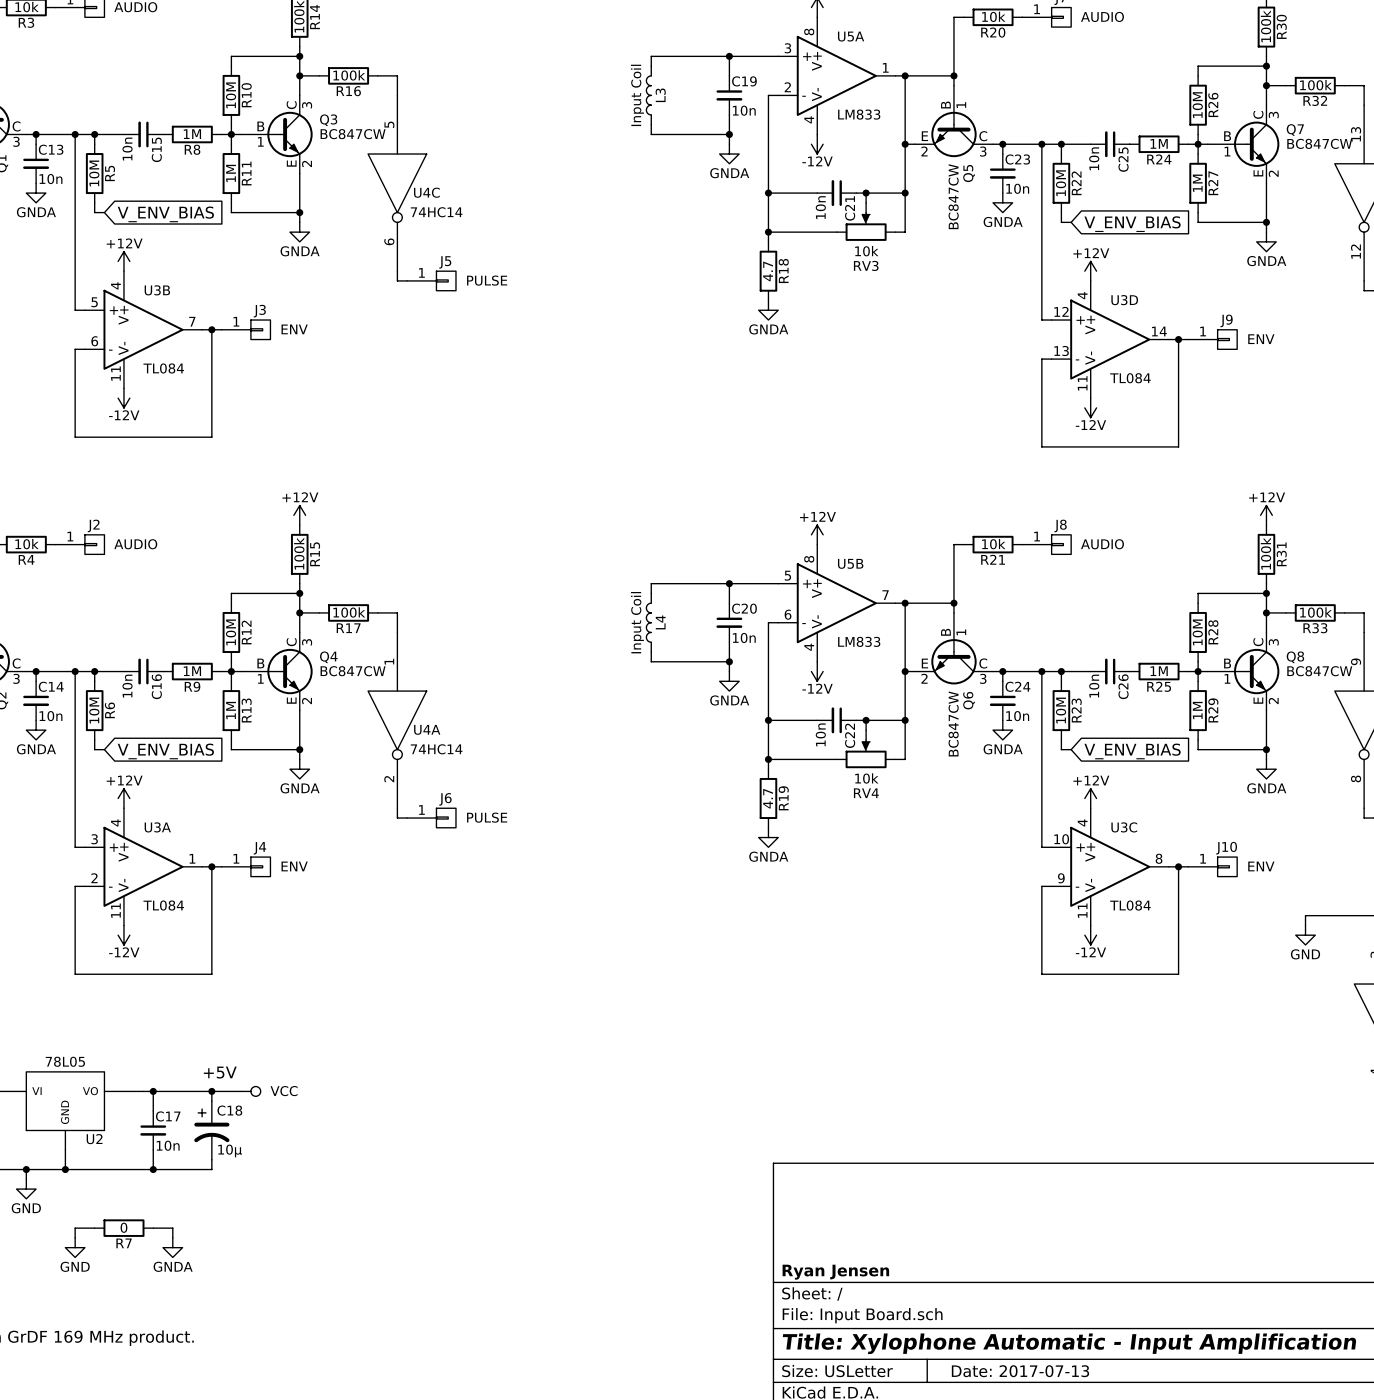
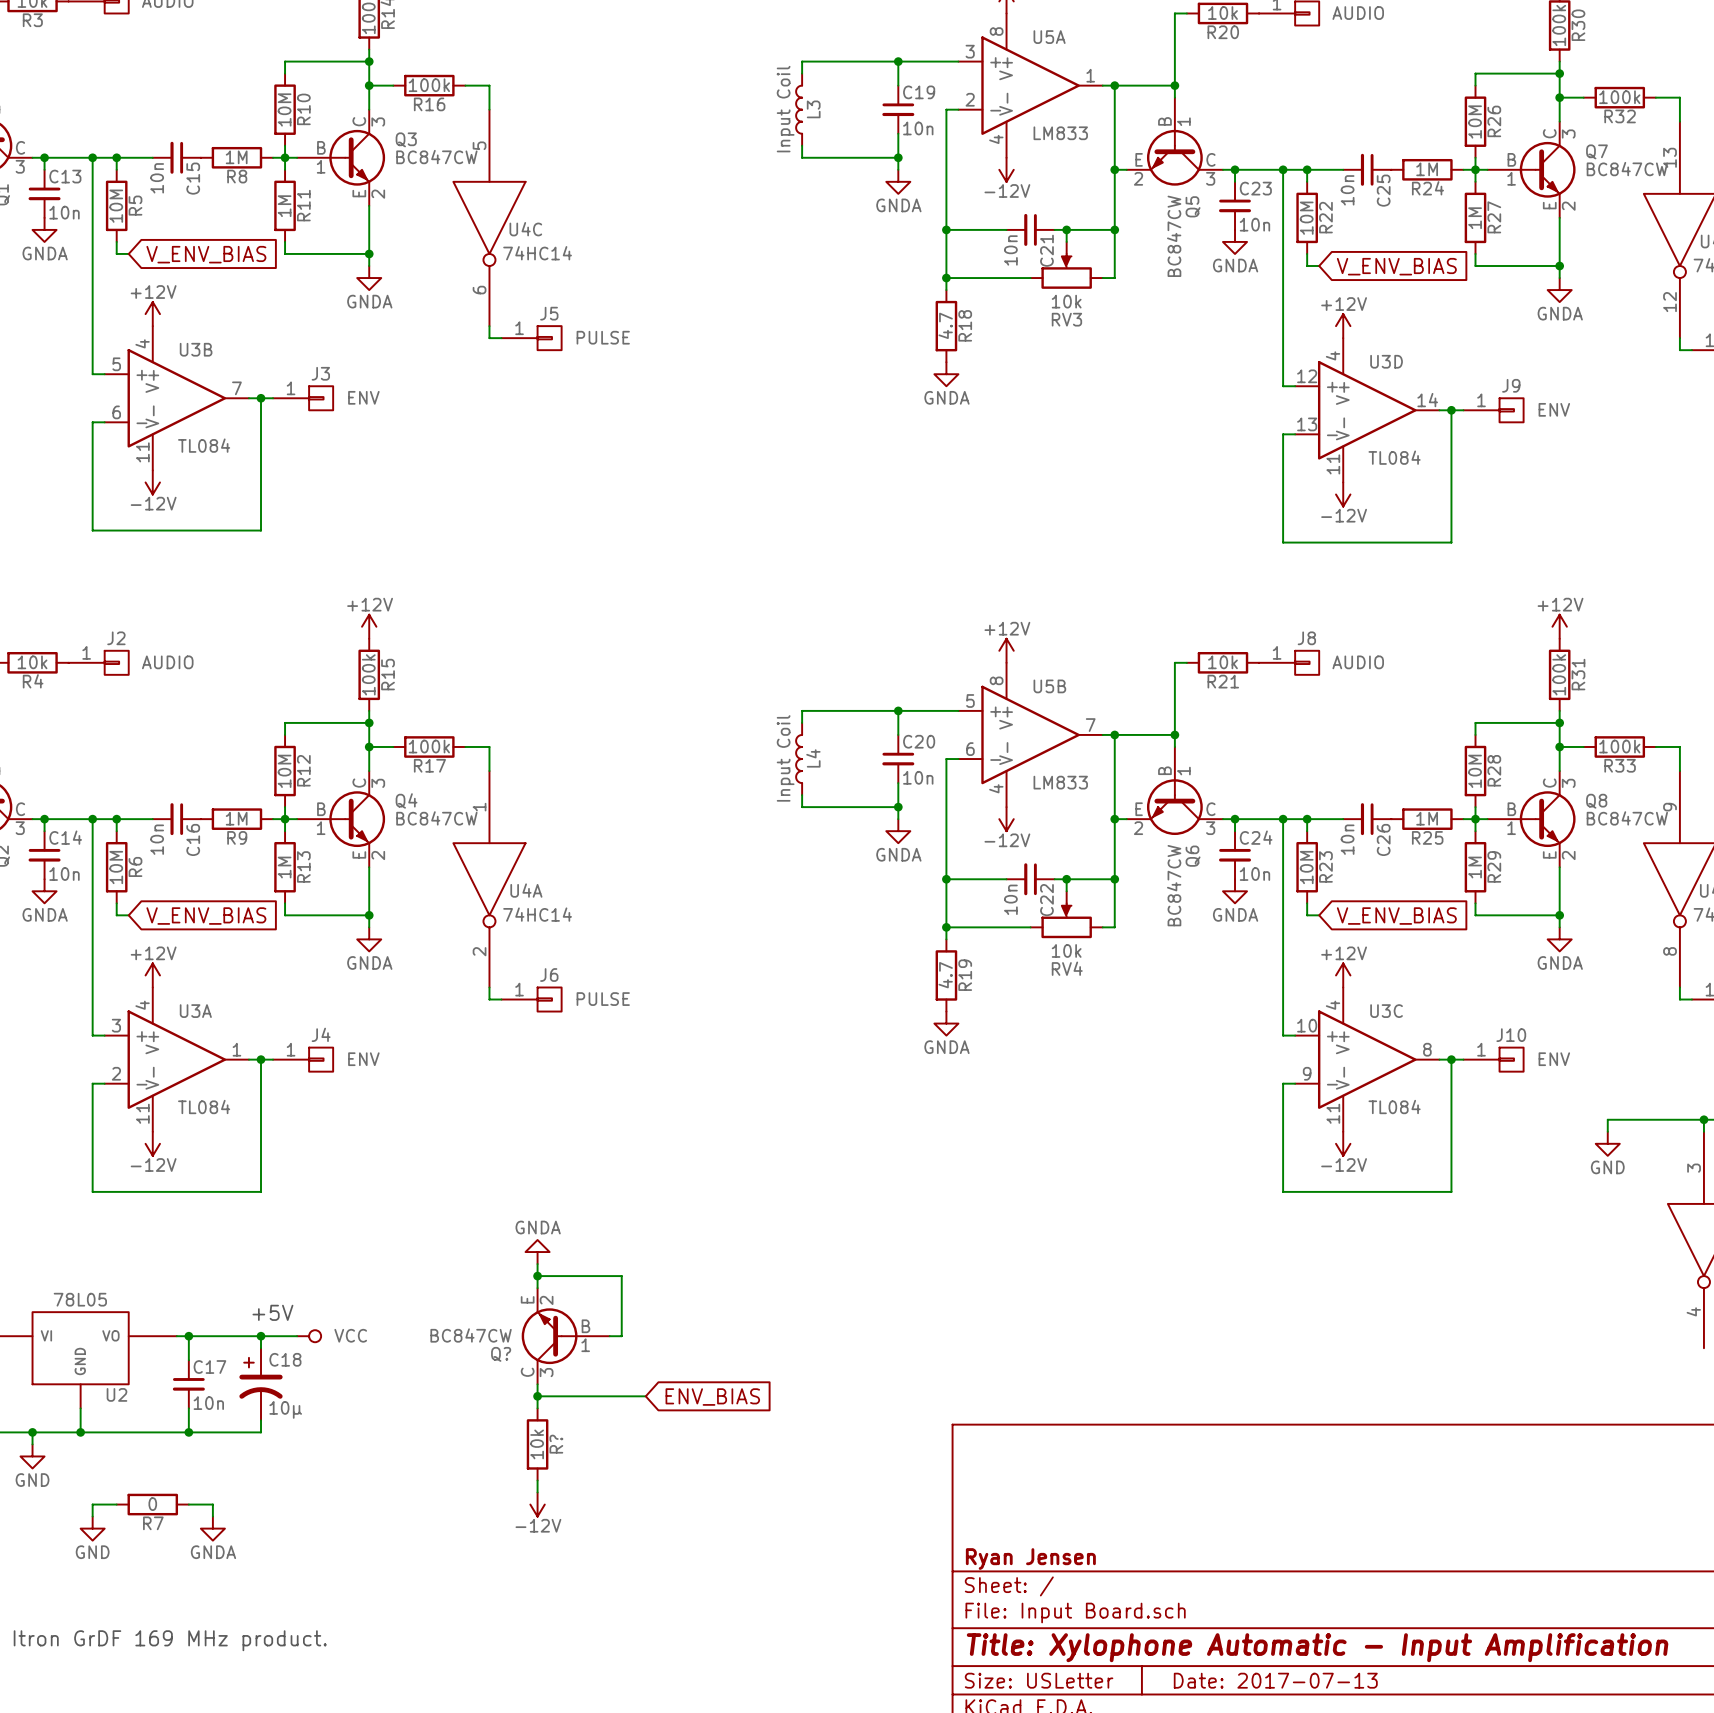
power symbol: none -> GNDA (537, 1252)
wire: none -> (537, 1264) (537, 1288)
wire: none -> (537, 1276) (621, 1276) (621, 1336) (609, 1336)
junction: none -> (537, 1276)
Q?: none -> BC847CW (565, 1336)
wire: none -> (537, 1384) (537, 1408)
wire: none -> (537, 1396) (645, 1396)
junction: none -> (537, 1396)
global label: none -> ENV_BIAS (712, 1397)
R?: none -> 10k (537, 1444)
wire: none -> (537, 1480) (537, 1492)
power symbol: none -> -12V (537, 1504)

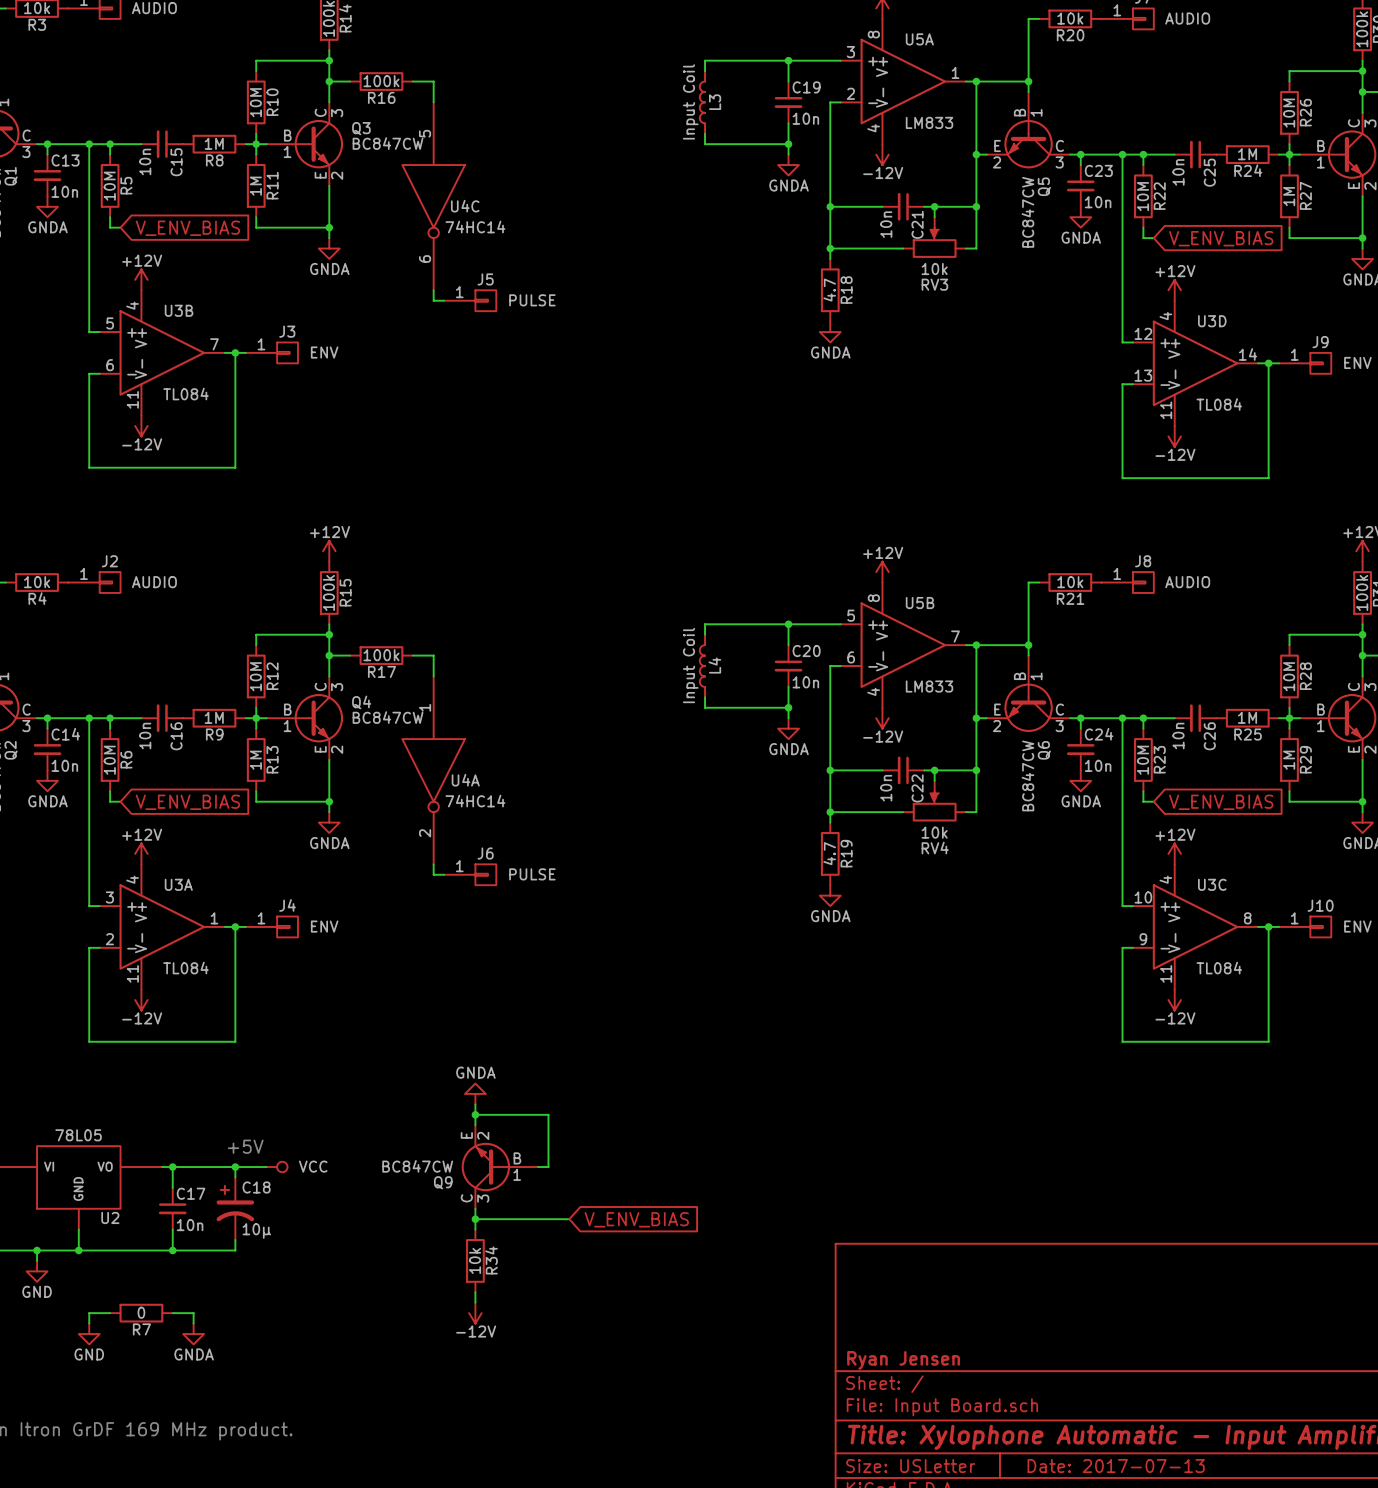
Q? name: Q? (501, 1354) -> Q9 (443, 1182)
global label: ENV_BIAS (712, 1397) -> V_ENV_BIAS (636, 1219)
R? name: R? (556, 1444) -> R34 (491, 1260)

